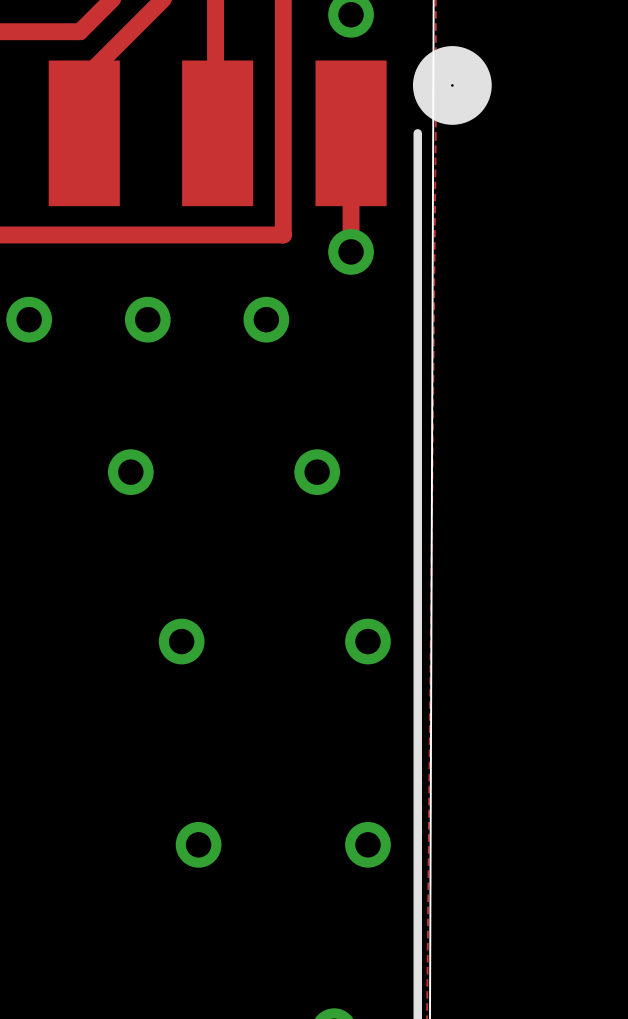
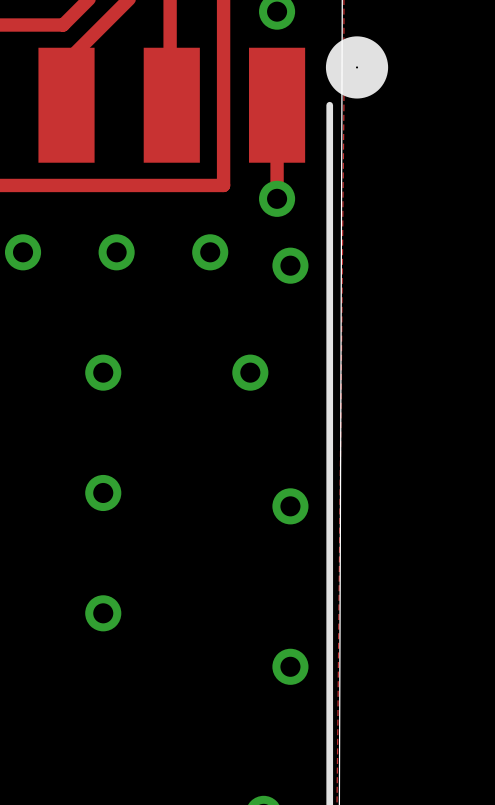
via: none -> (290, 265)
via position: (181, 641) -> (103, 492)
via: none -> (103, 613)
via: (198, 844) -> none

